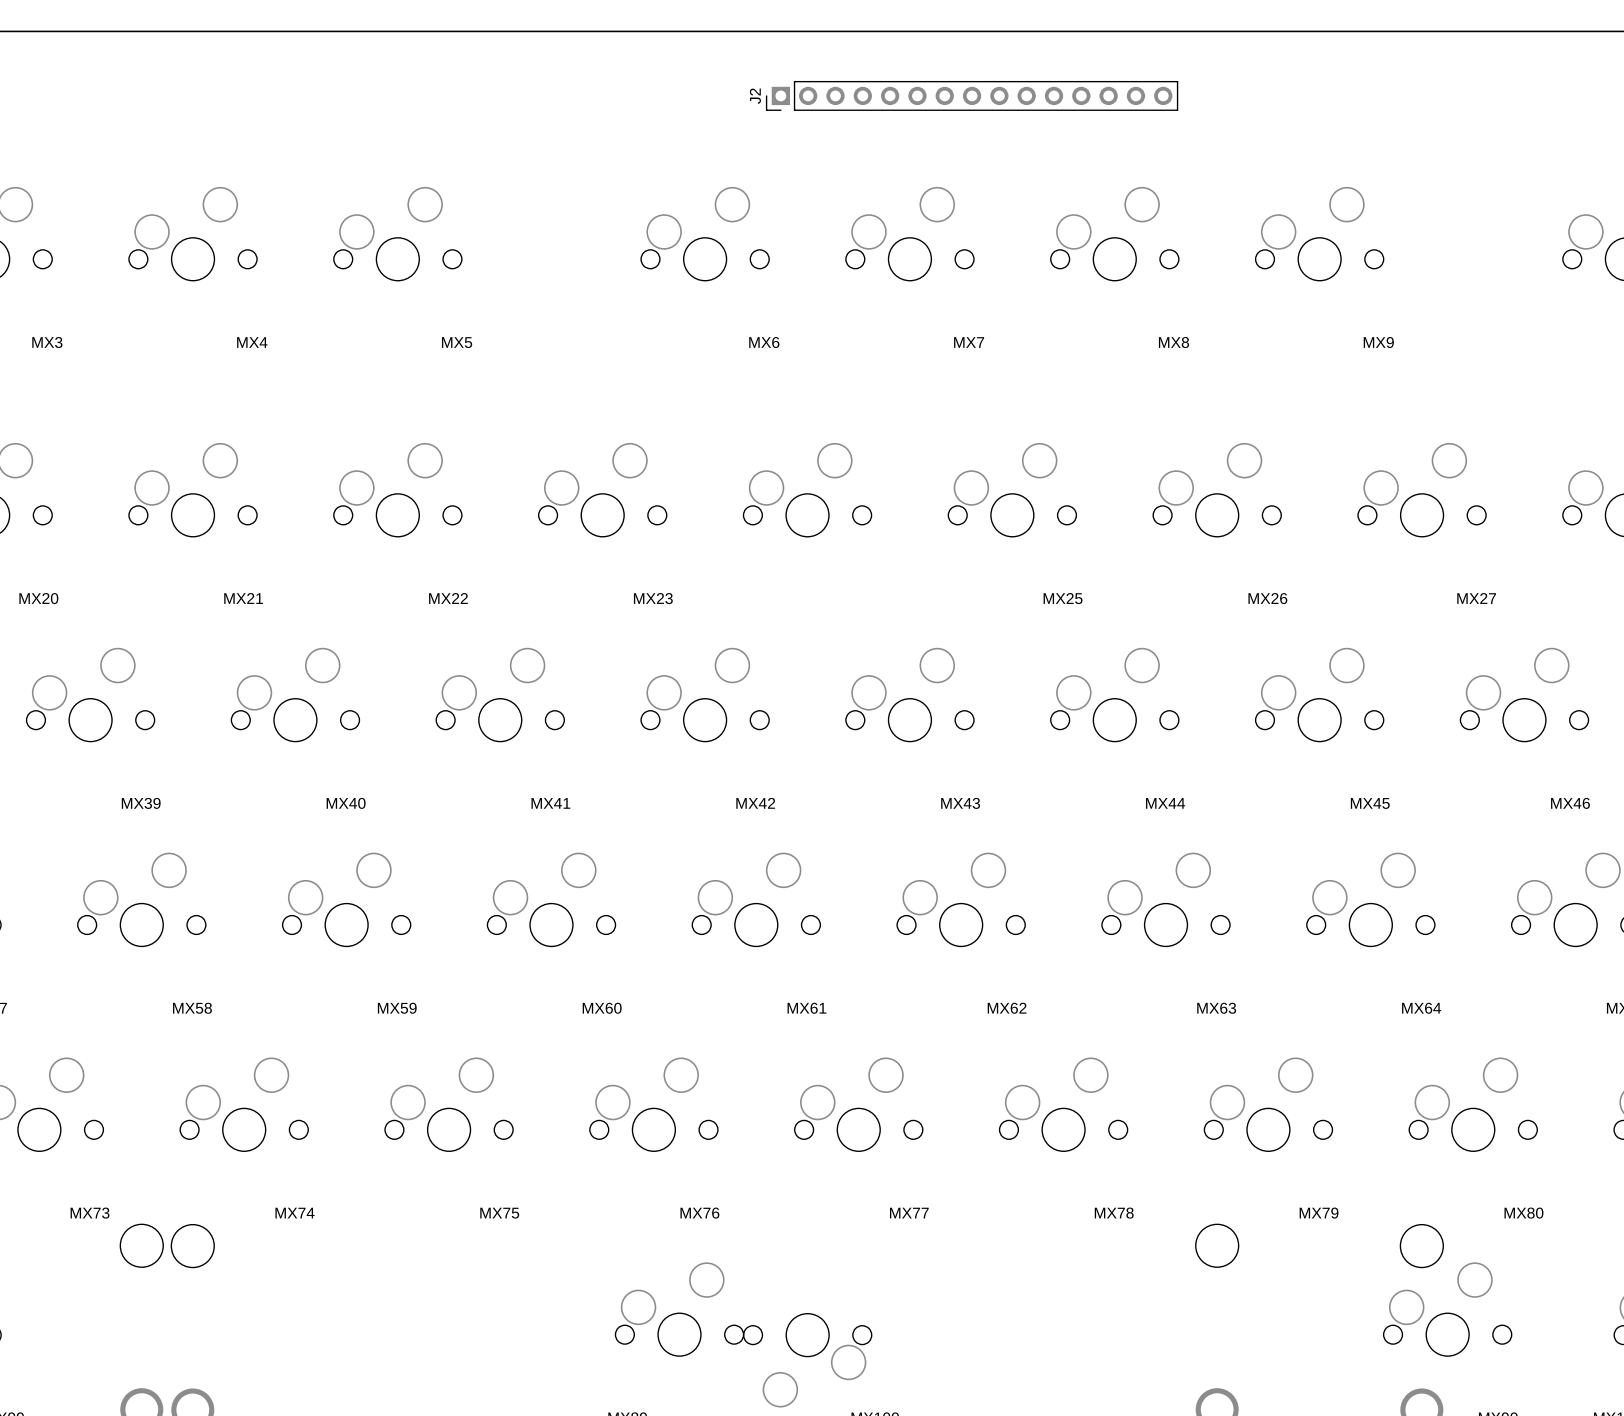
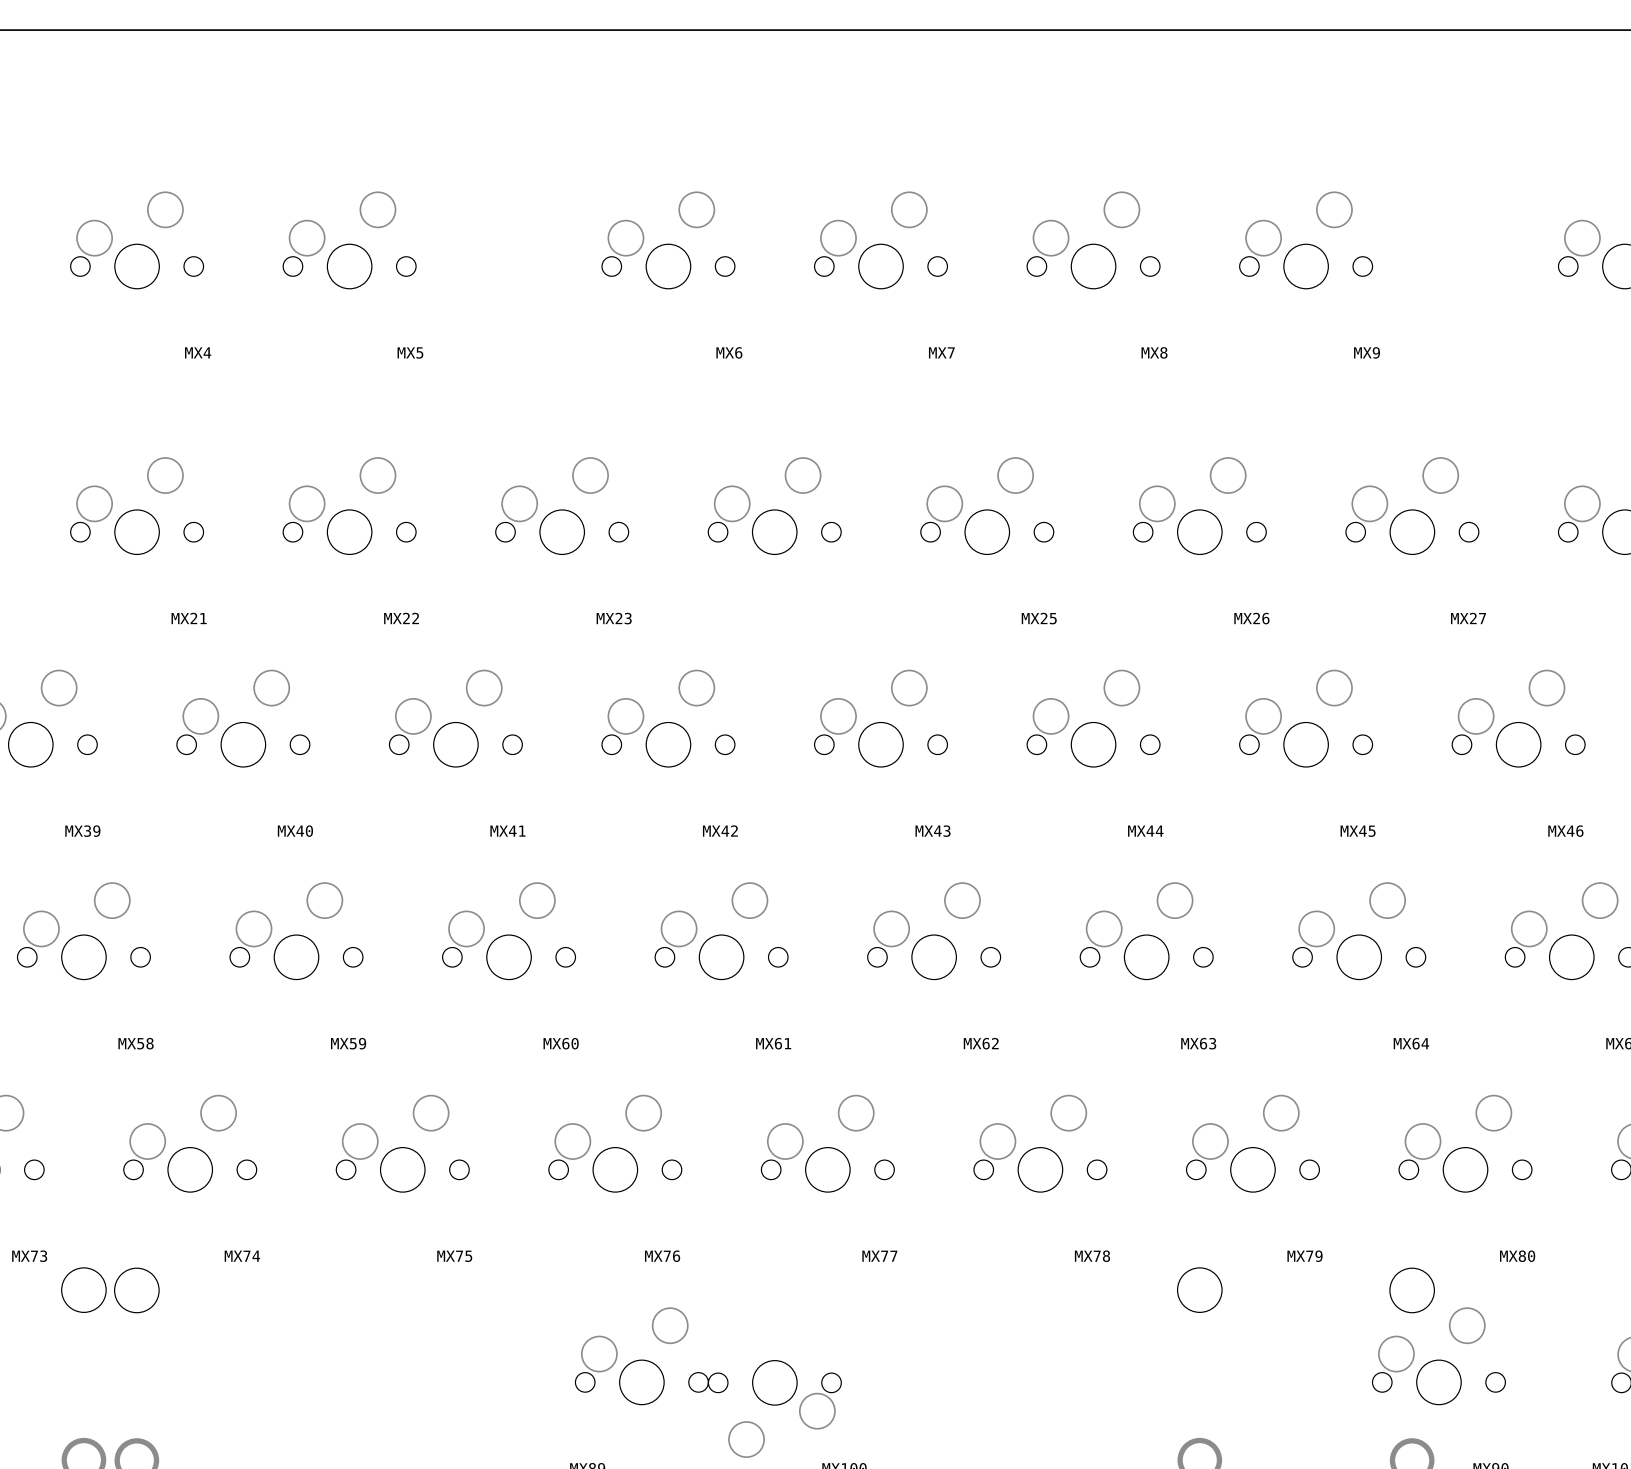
J2: (972, 95) -> none

